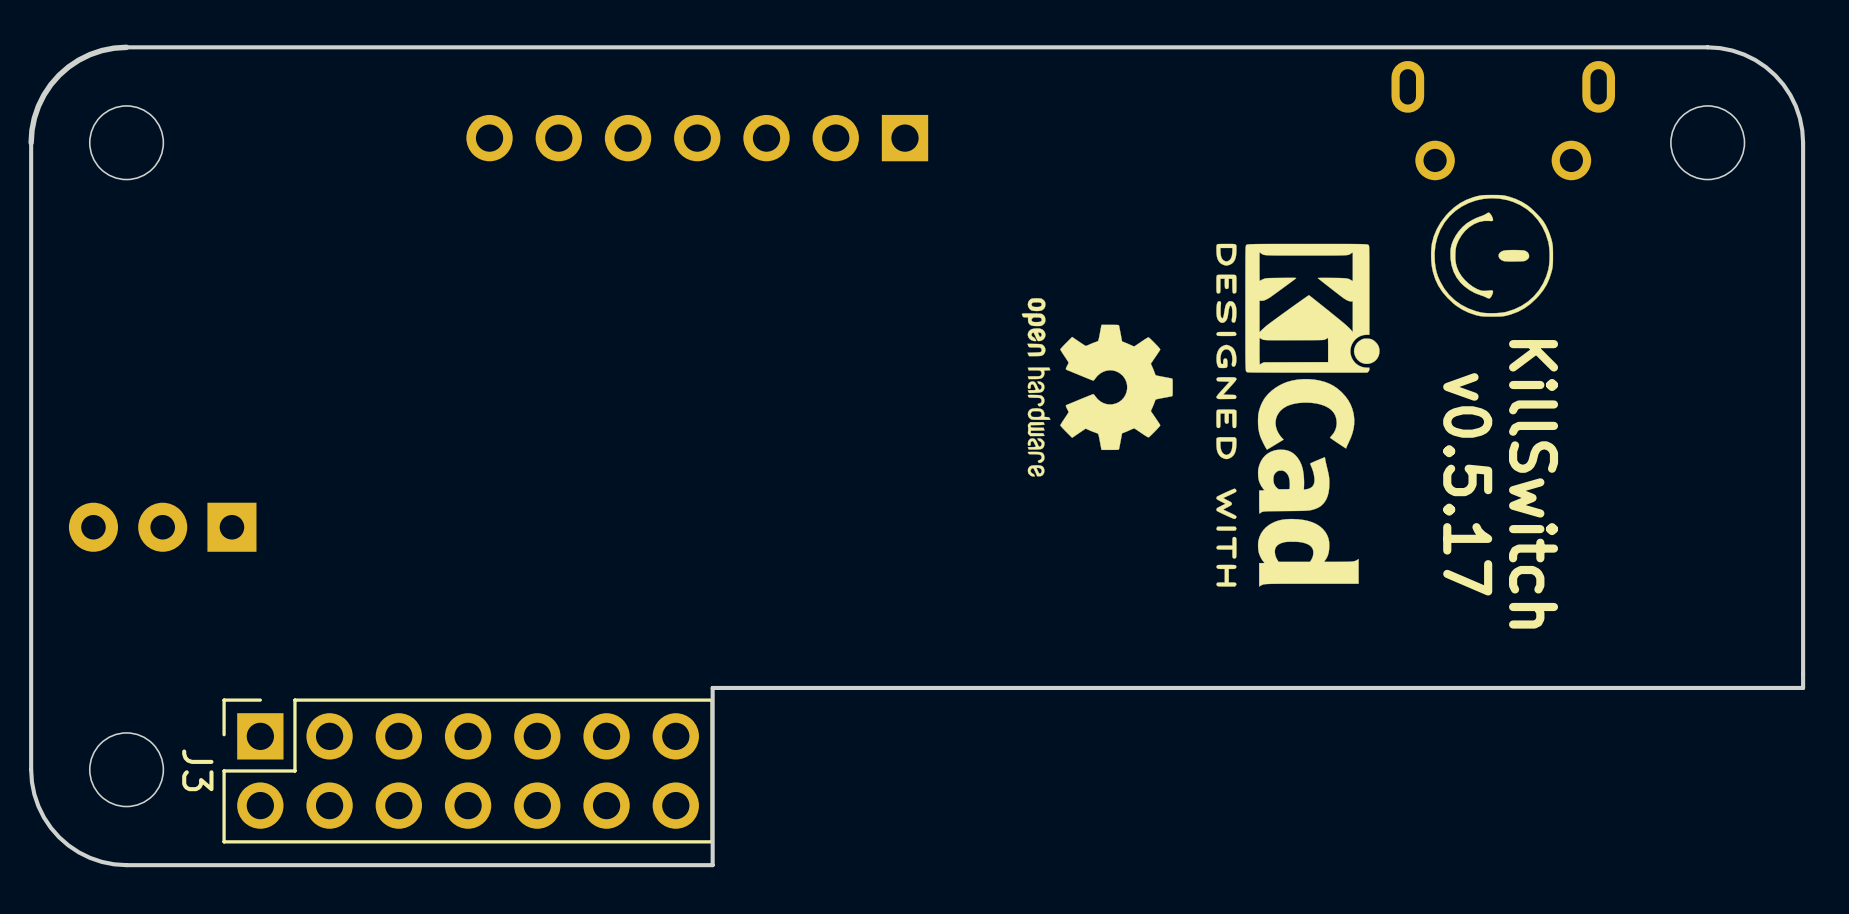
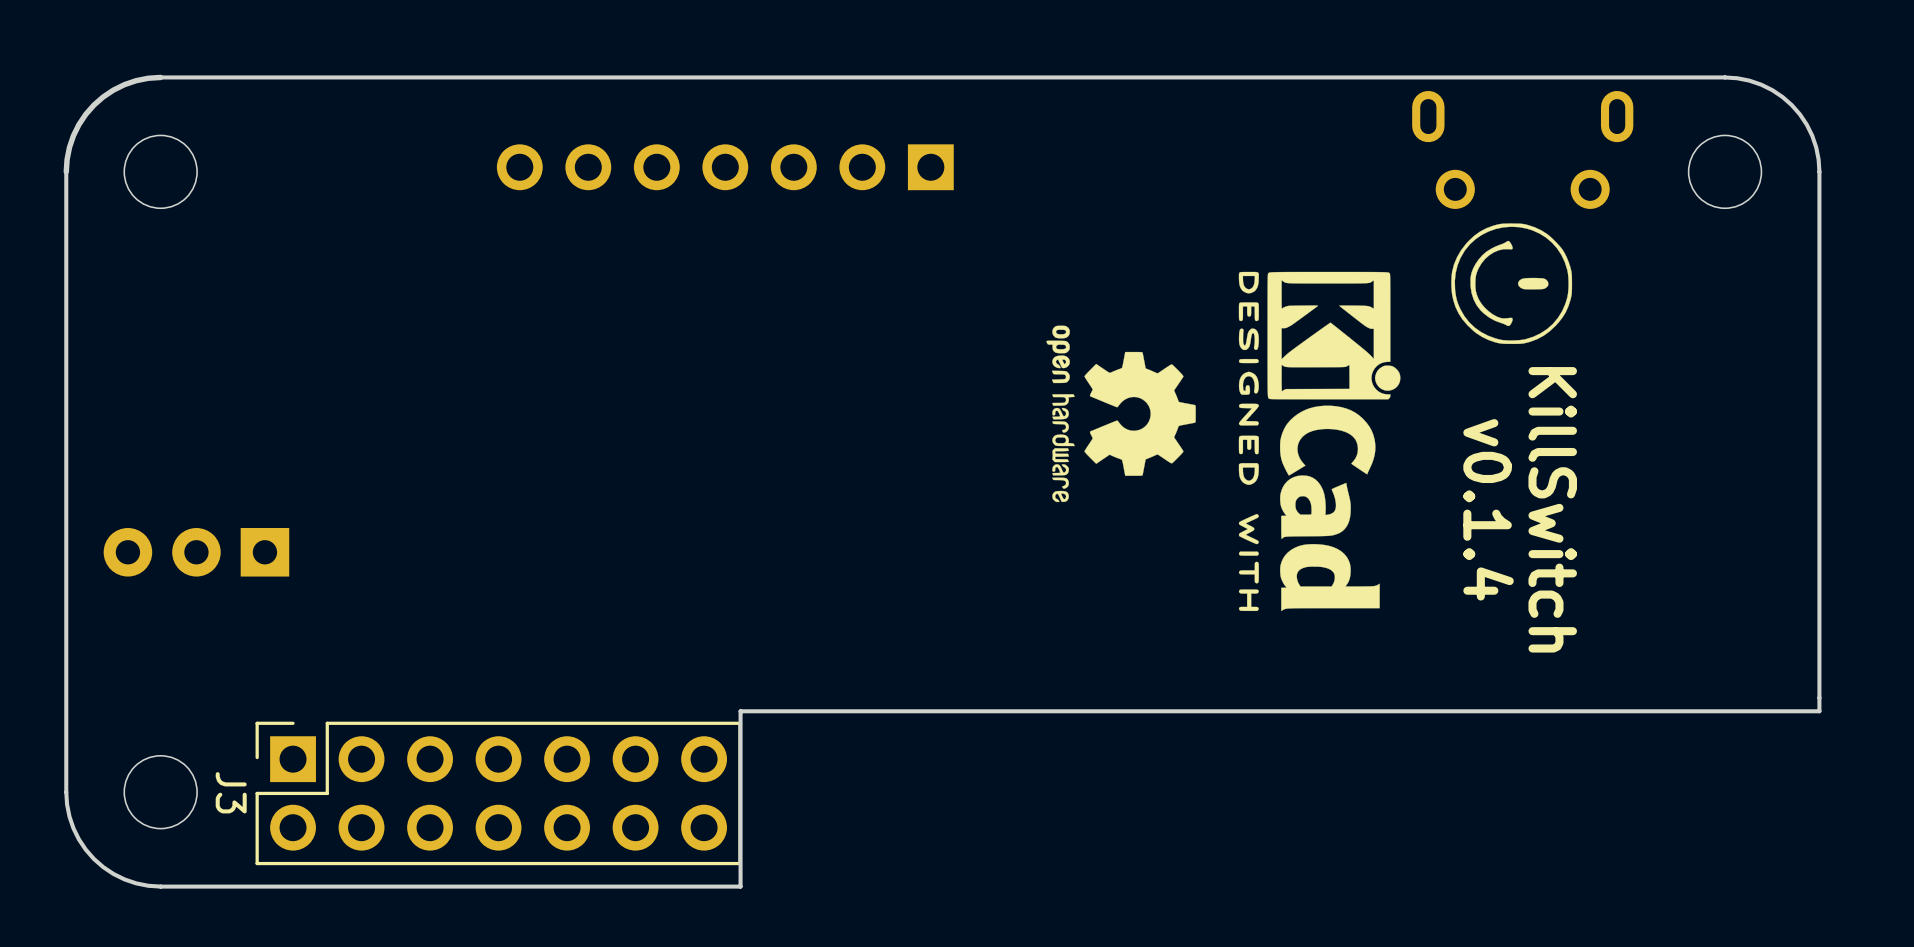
text: v0.5.17 (1467, 484) -> v0.1.4 (1488, 509)

